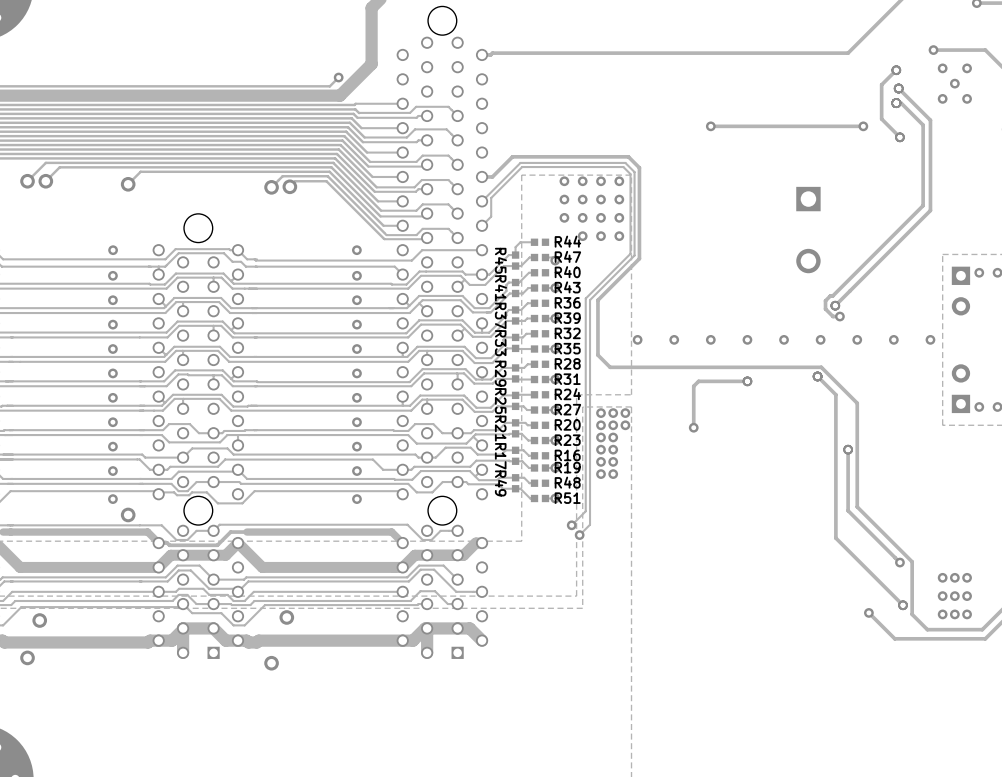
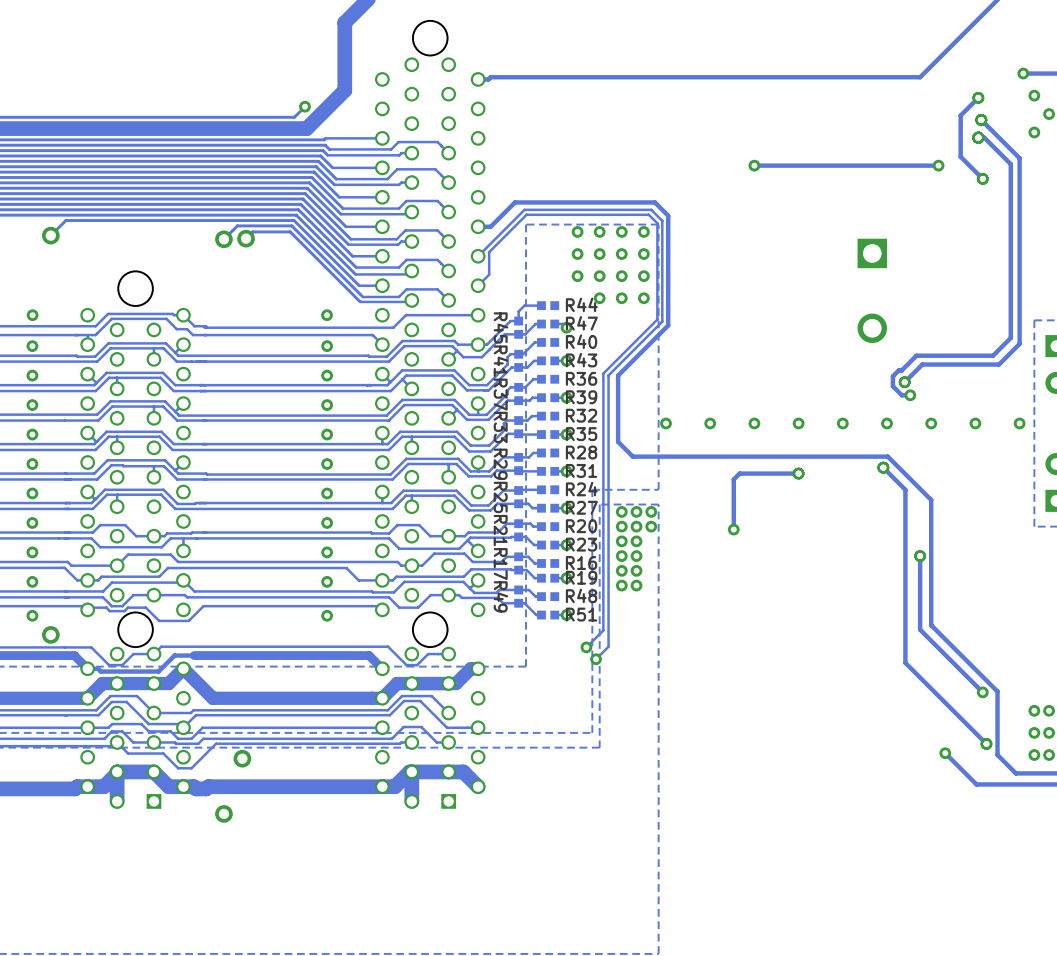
track: (923, 205) (845, 283) -> (1010, 261) (1010, 338) (993, 355) (916, 355)
track: (930, 210) (849, 291) -> (1019, 267) (1019, 343) (998, 364) (922, 364)

